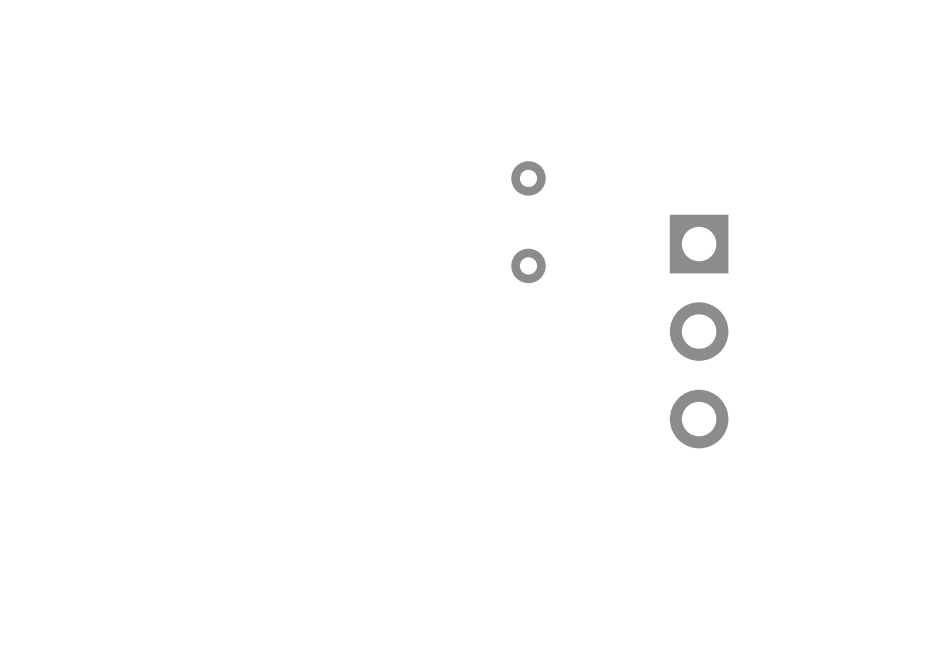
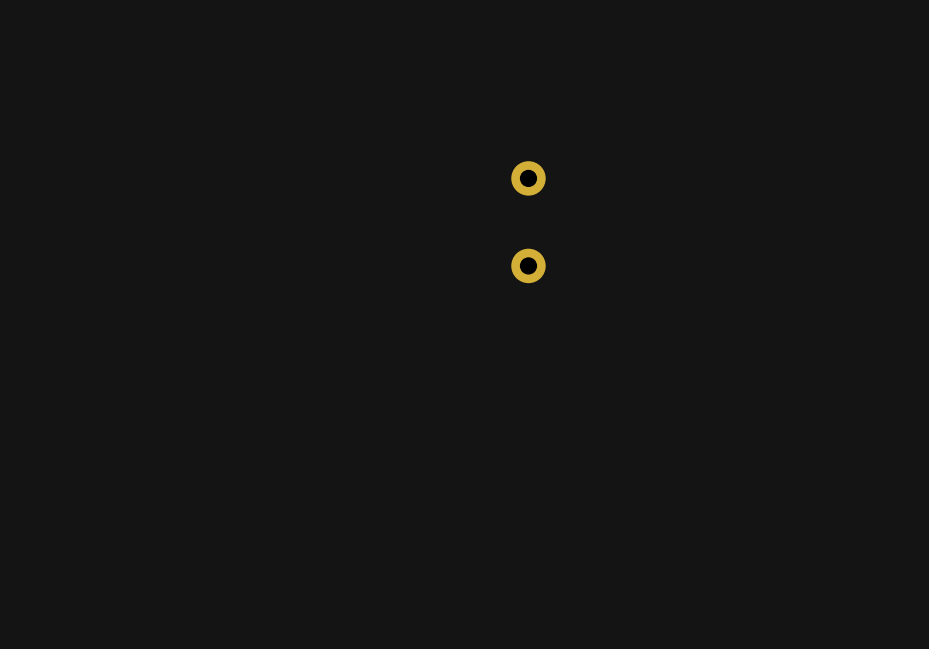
part: (699, 331) -> none

